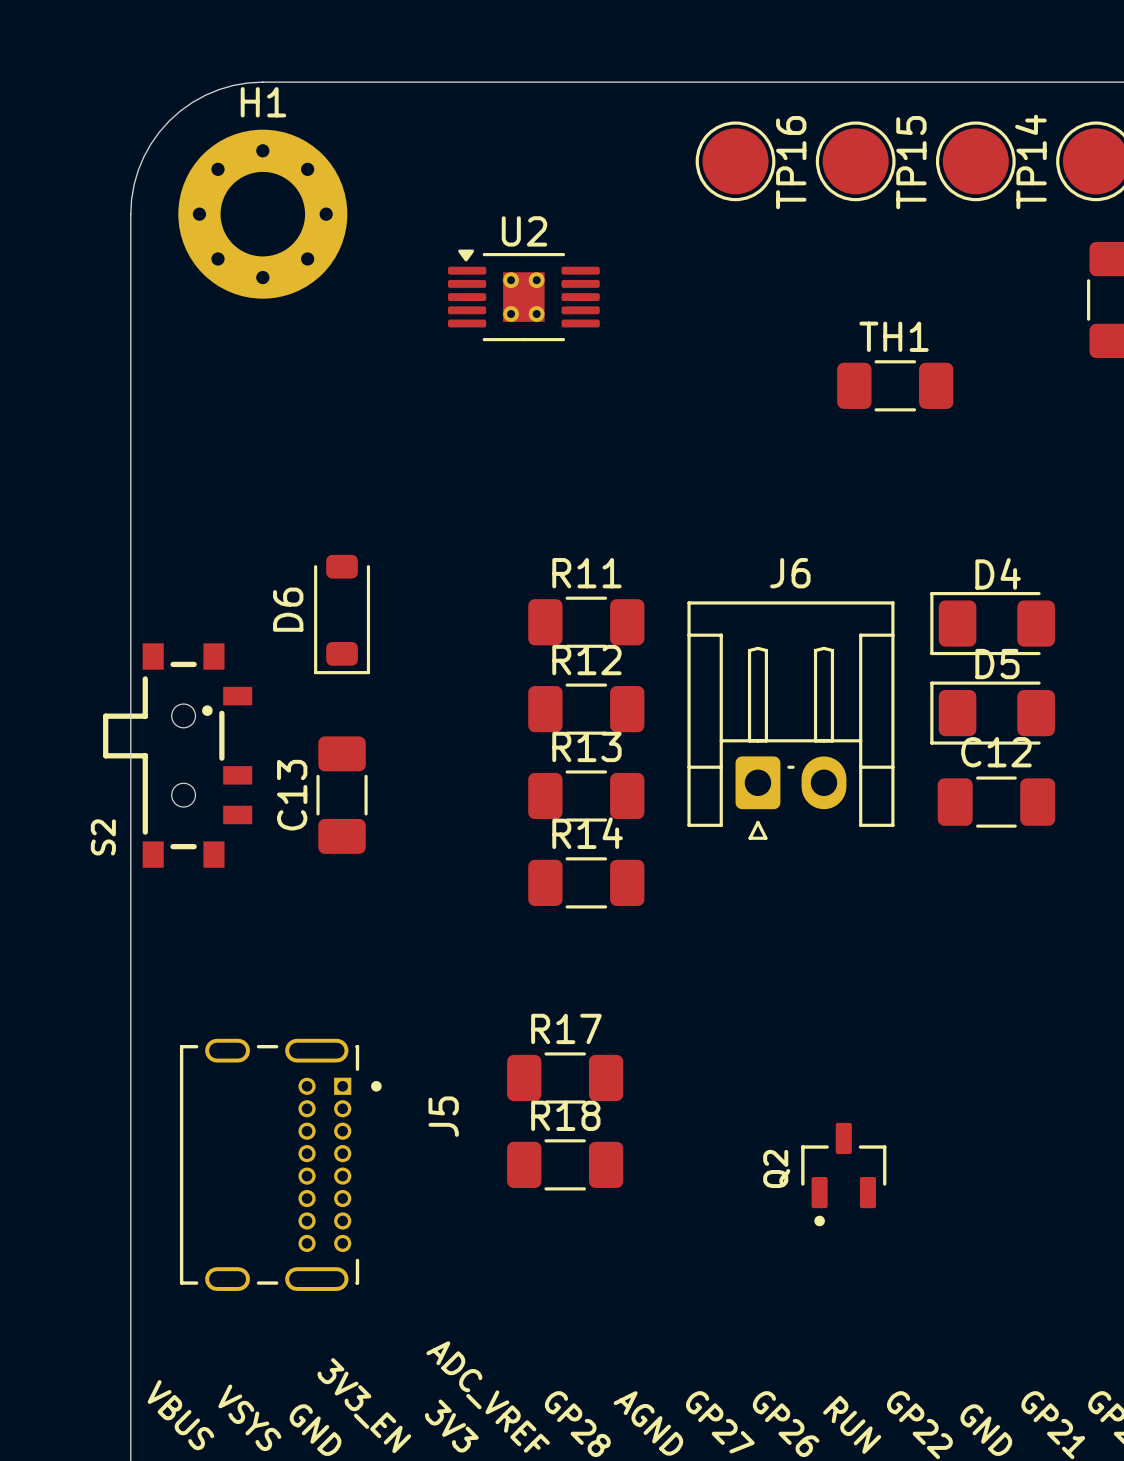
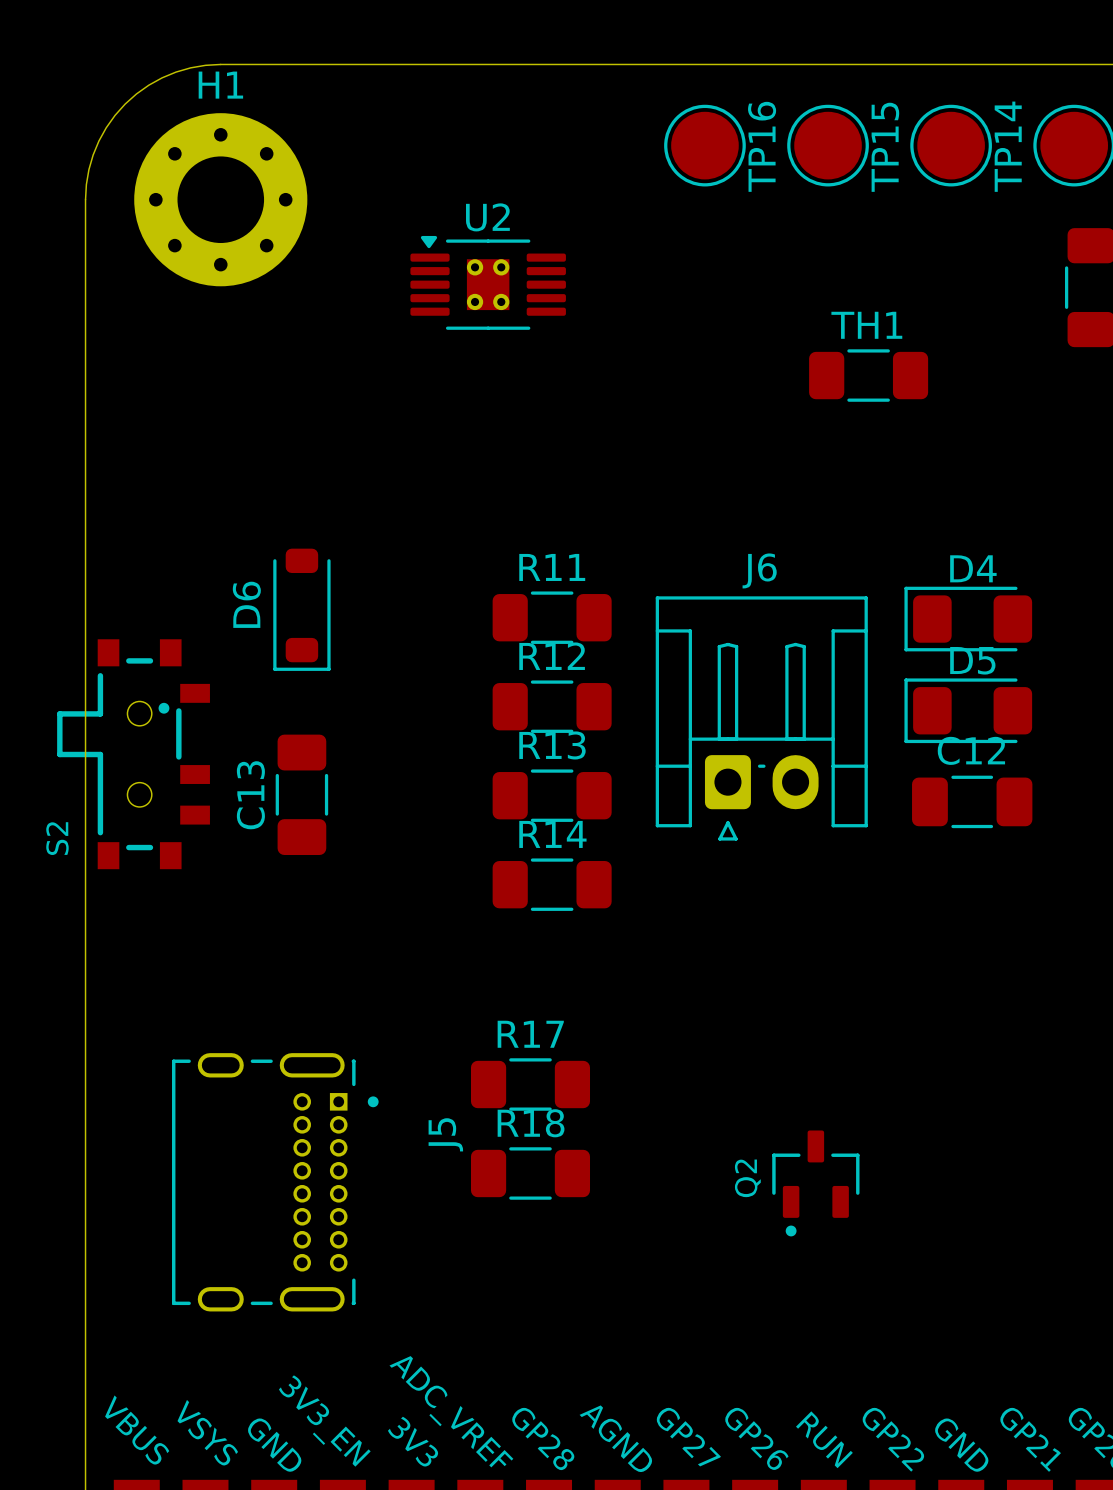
J5 position: (280, 1164) -> (275, 1182)

